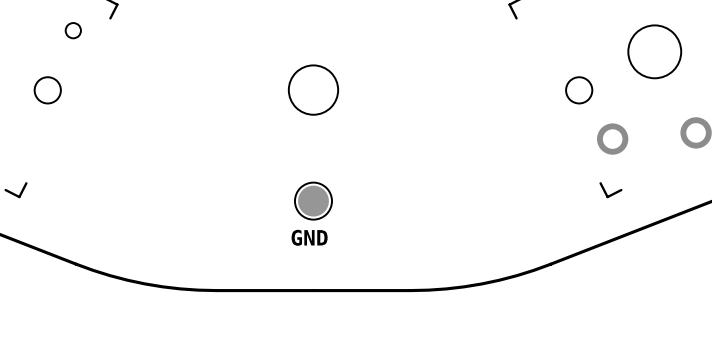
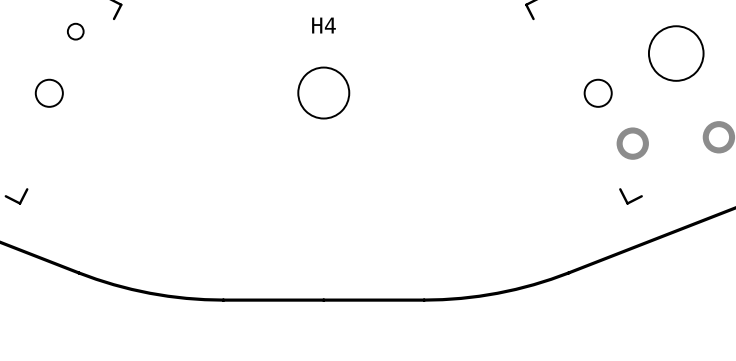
H4 name: none -> H4 (323, 25)
part: (313, 201) -> none
text: GND (309, 237) -> none

